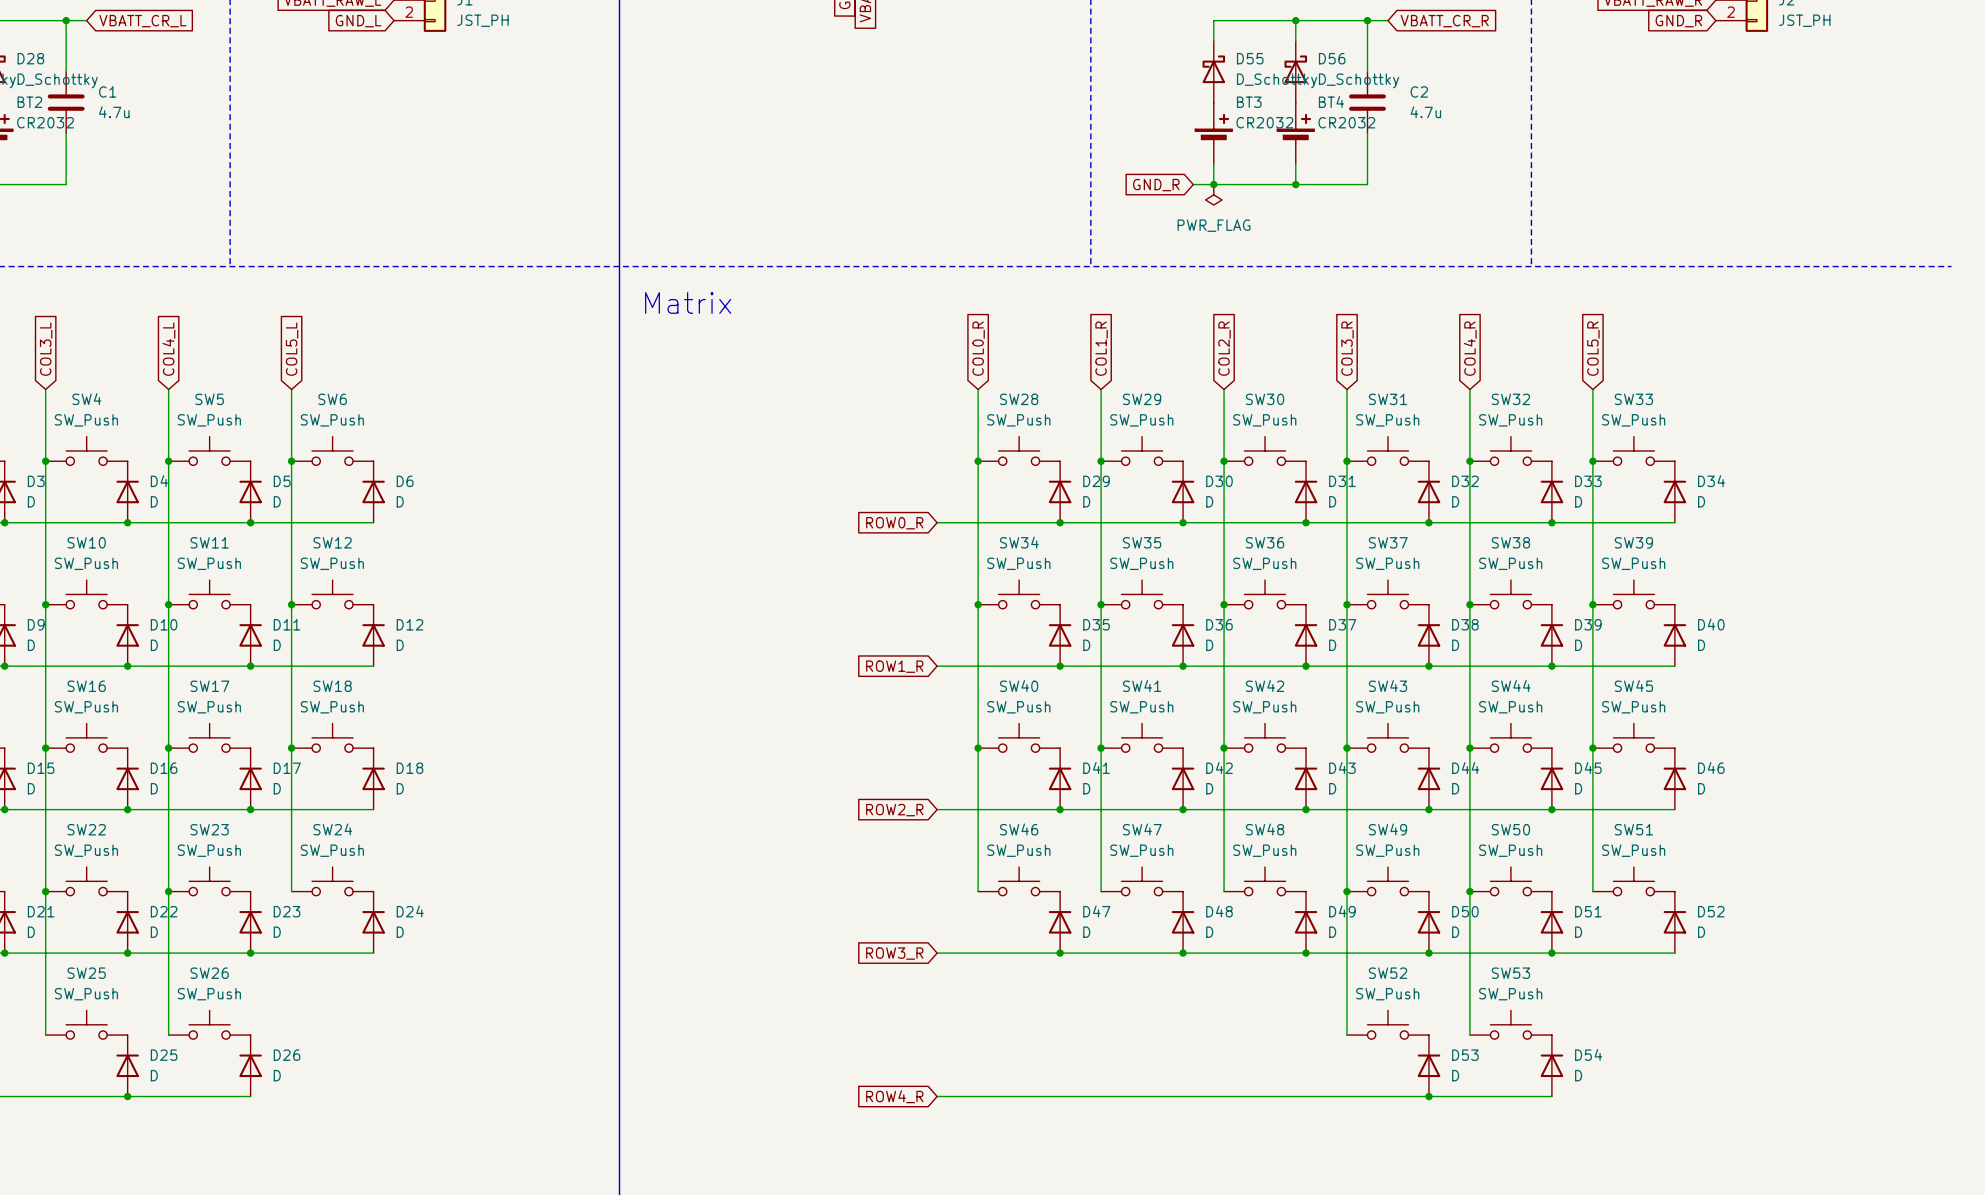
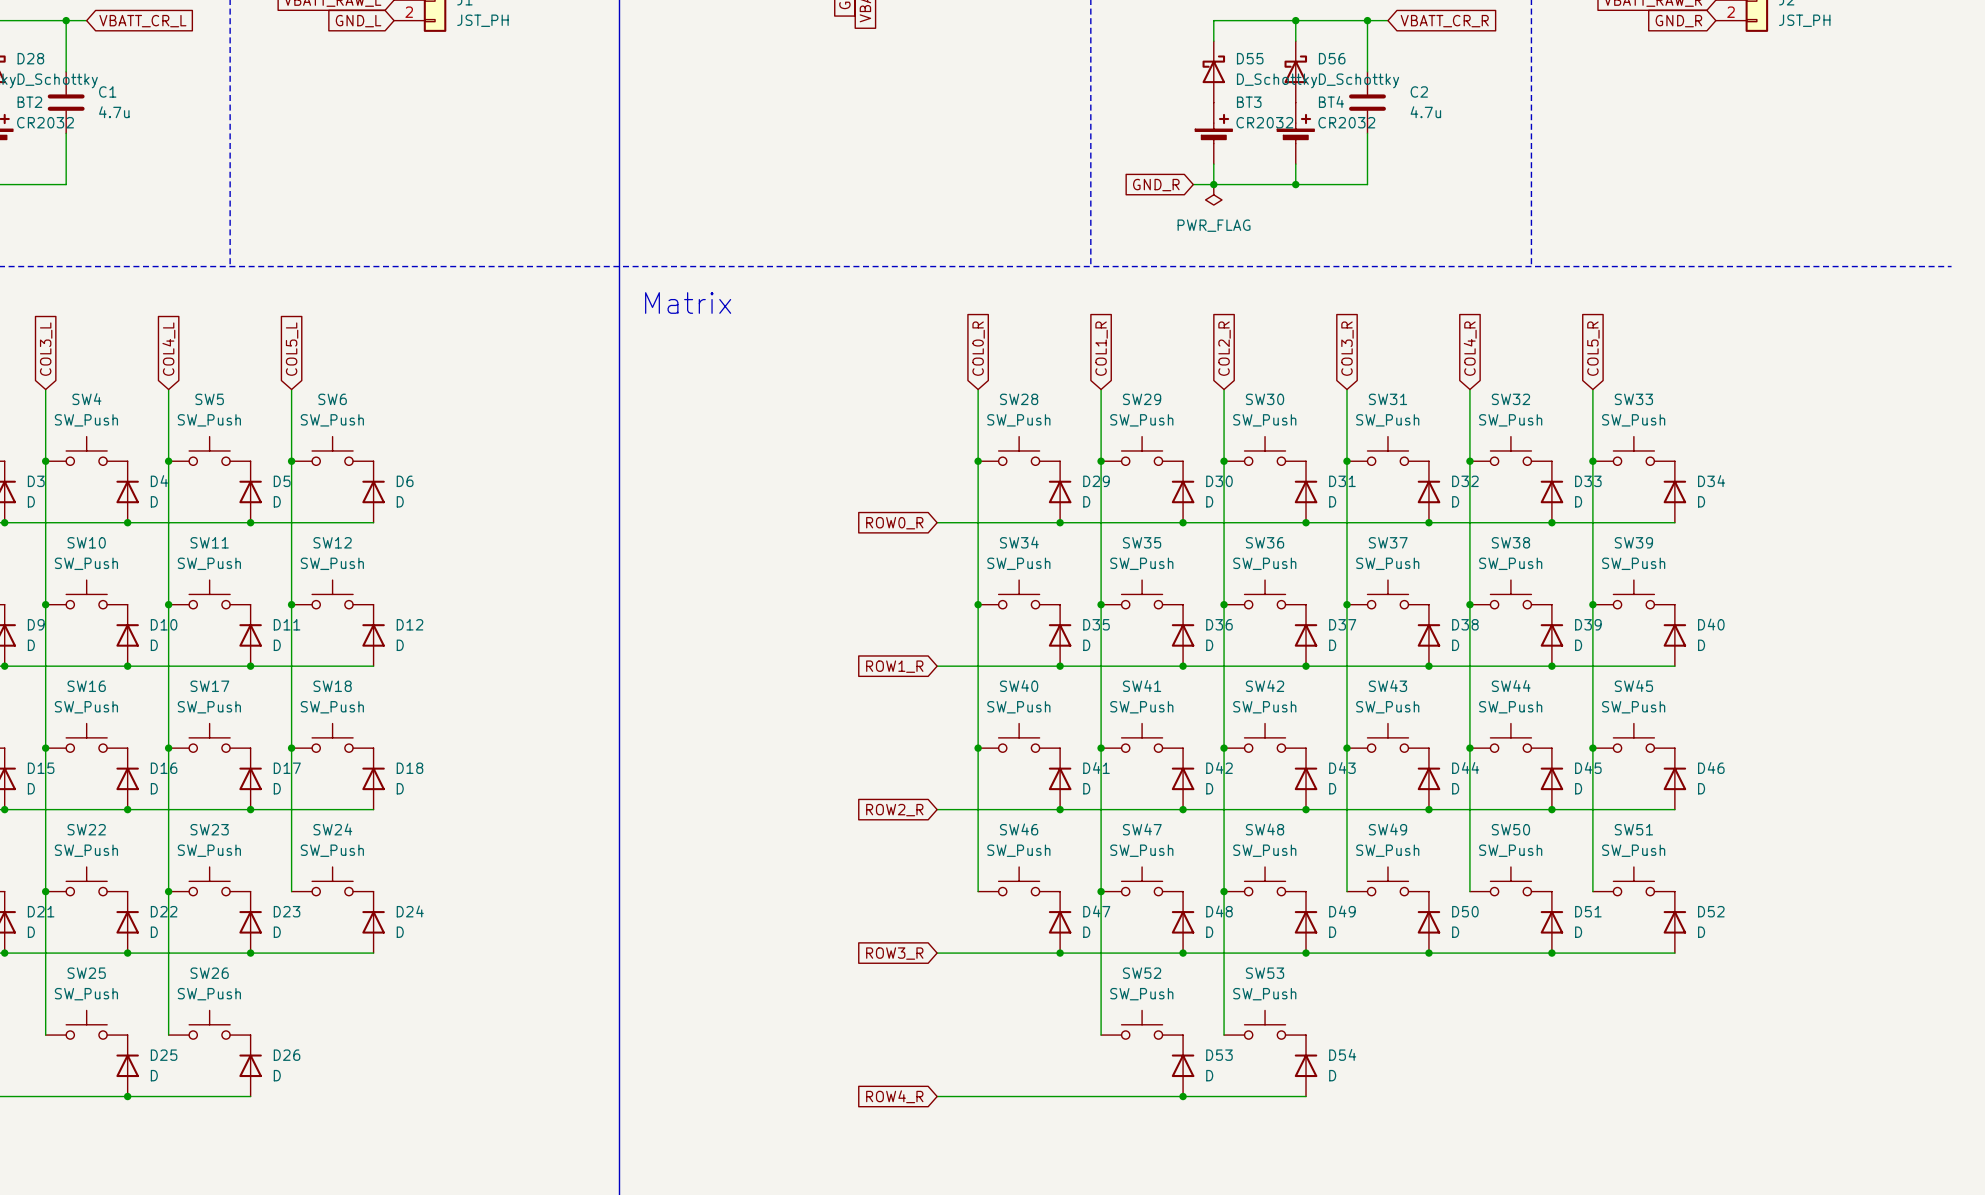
wire: none -> (1101, 891) (1101, 1035)
junction: none -> (1101, 891)
junction: none -> (1224, 891)
wire: (1346, 891) (1346, 1035) -> (1224, 891) (1224, 1035)
junction: (1346, 891) -> none
wire: (1469, 891) (1469, 1035) -> none
junction: (1469, 891) -> none
SW52 position: (1387, 1024) -> (1142, 1024)
SW53 position: (1510, 1024) -> (1265, 1024)
D53 position: (1428, 1065) -> (1183, 1065)
D54 position: (1551, 1065) -> (1306, 1065)
junction: none -> (1183, 1096)
wire: (1306, 1096) (1551, 1096) -> none
junction: (1428, 1096) -> none

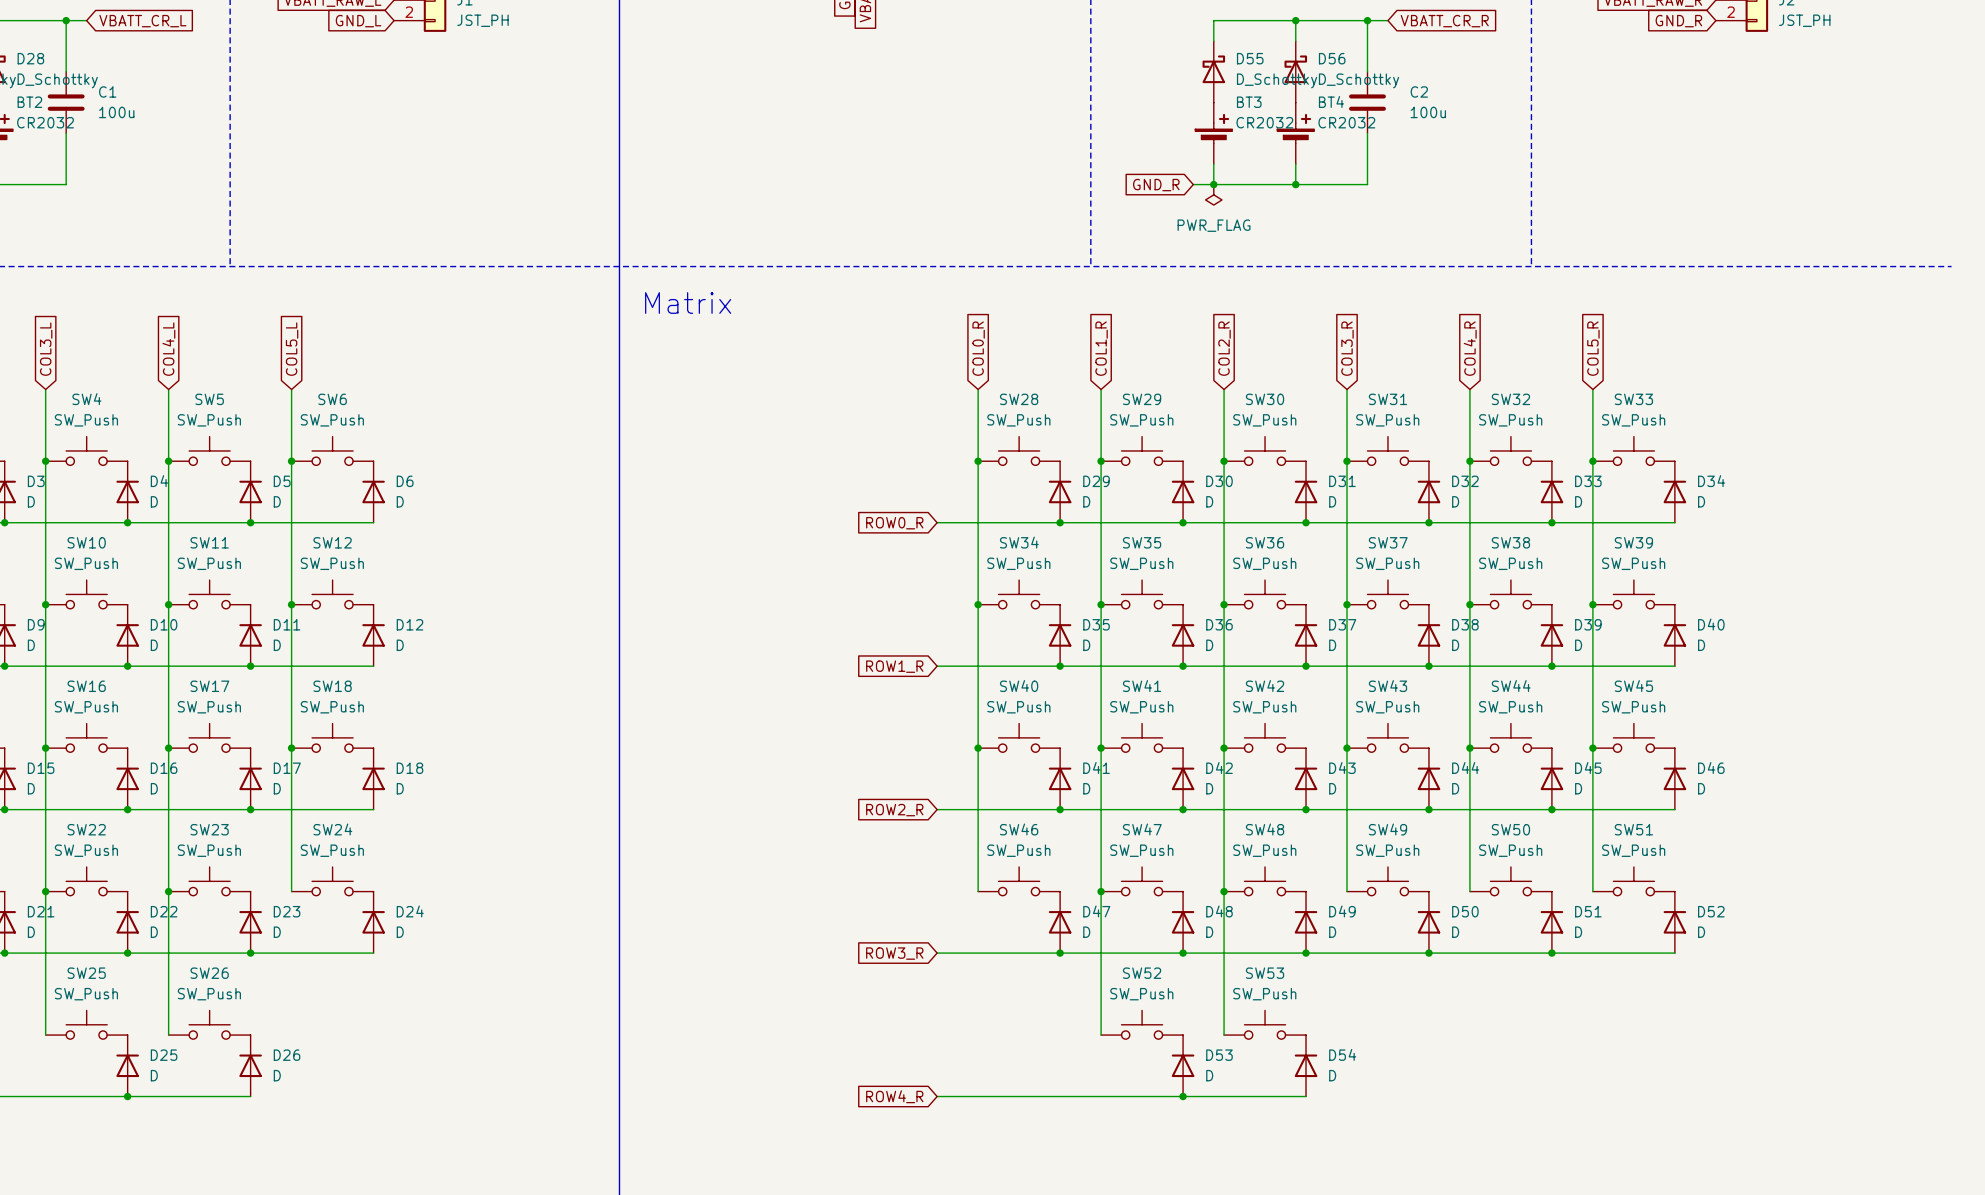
C1 value: 4.7u (114, 112) -> 100u (116, 112)
C2 value: 4.7u (1425, 112) -> 100u (1428, 112)

